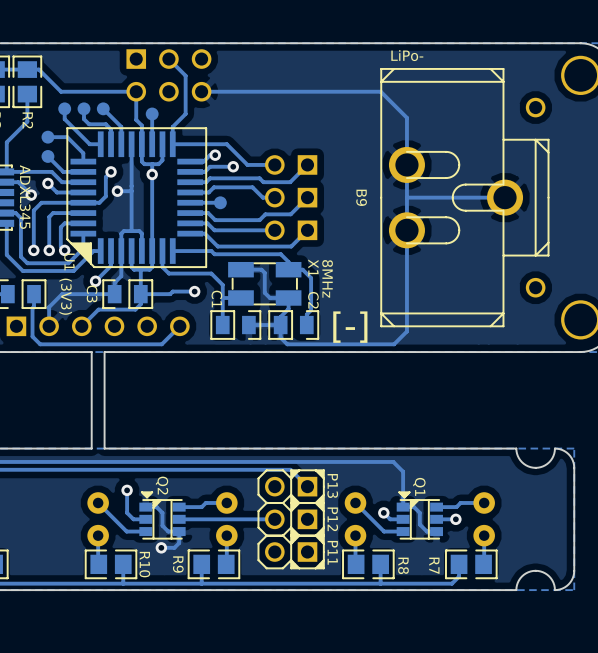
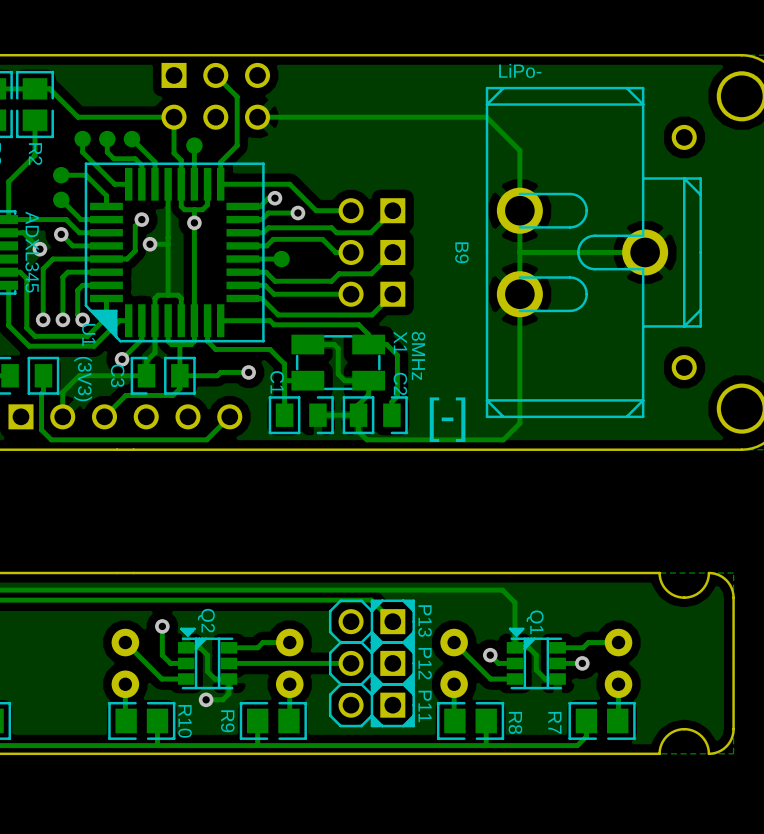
board edge: (91, 352) (91, 448) -> (133, 573) (117, 573)
board edge: (104, 352) (104, 448) -> (133, 449) (117, 449)

